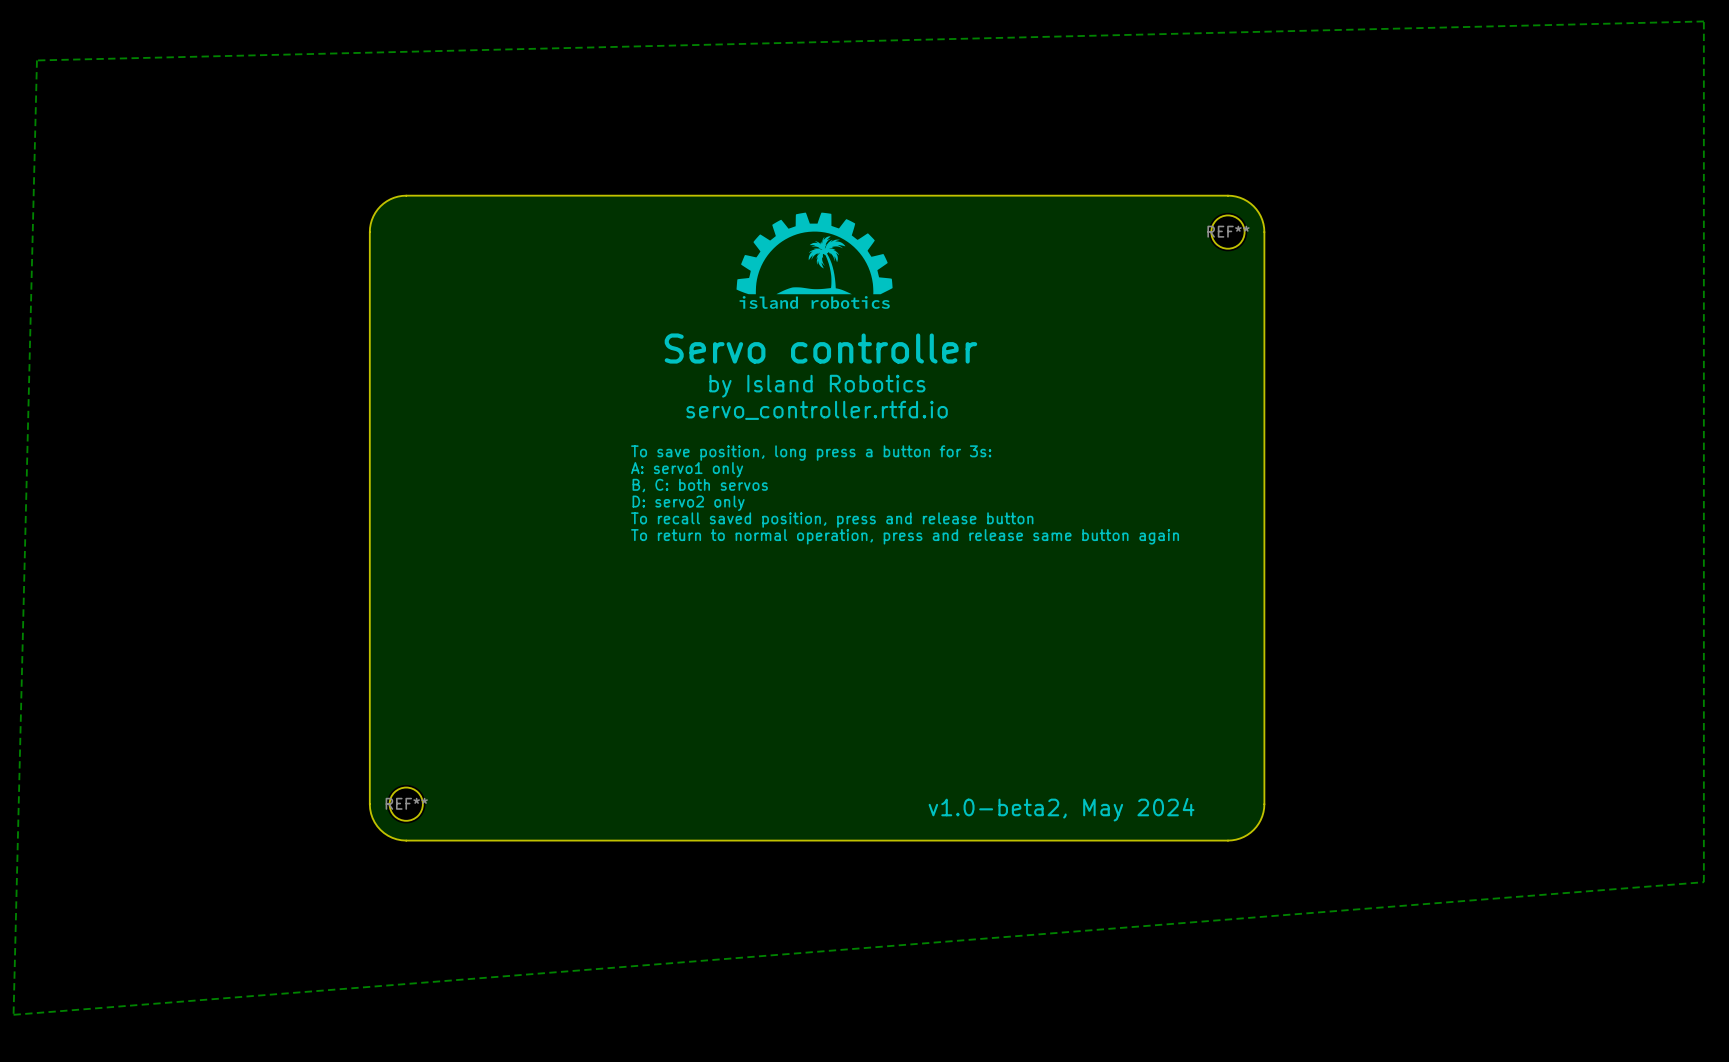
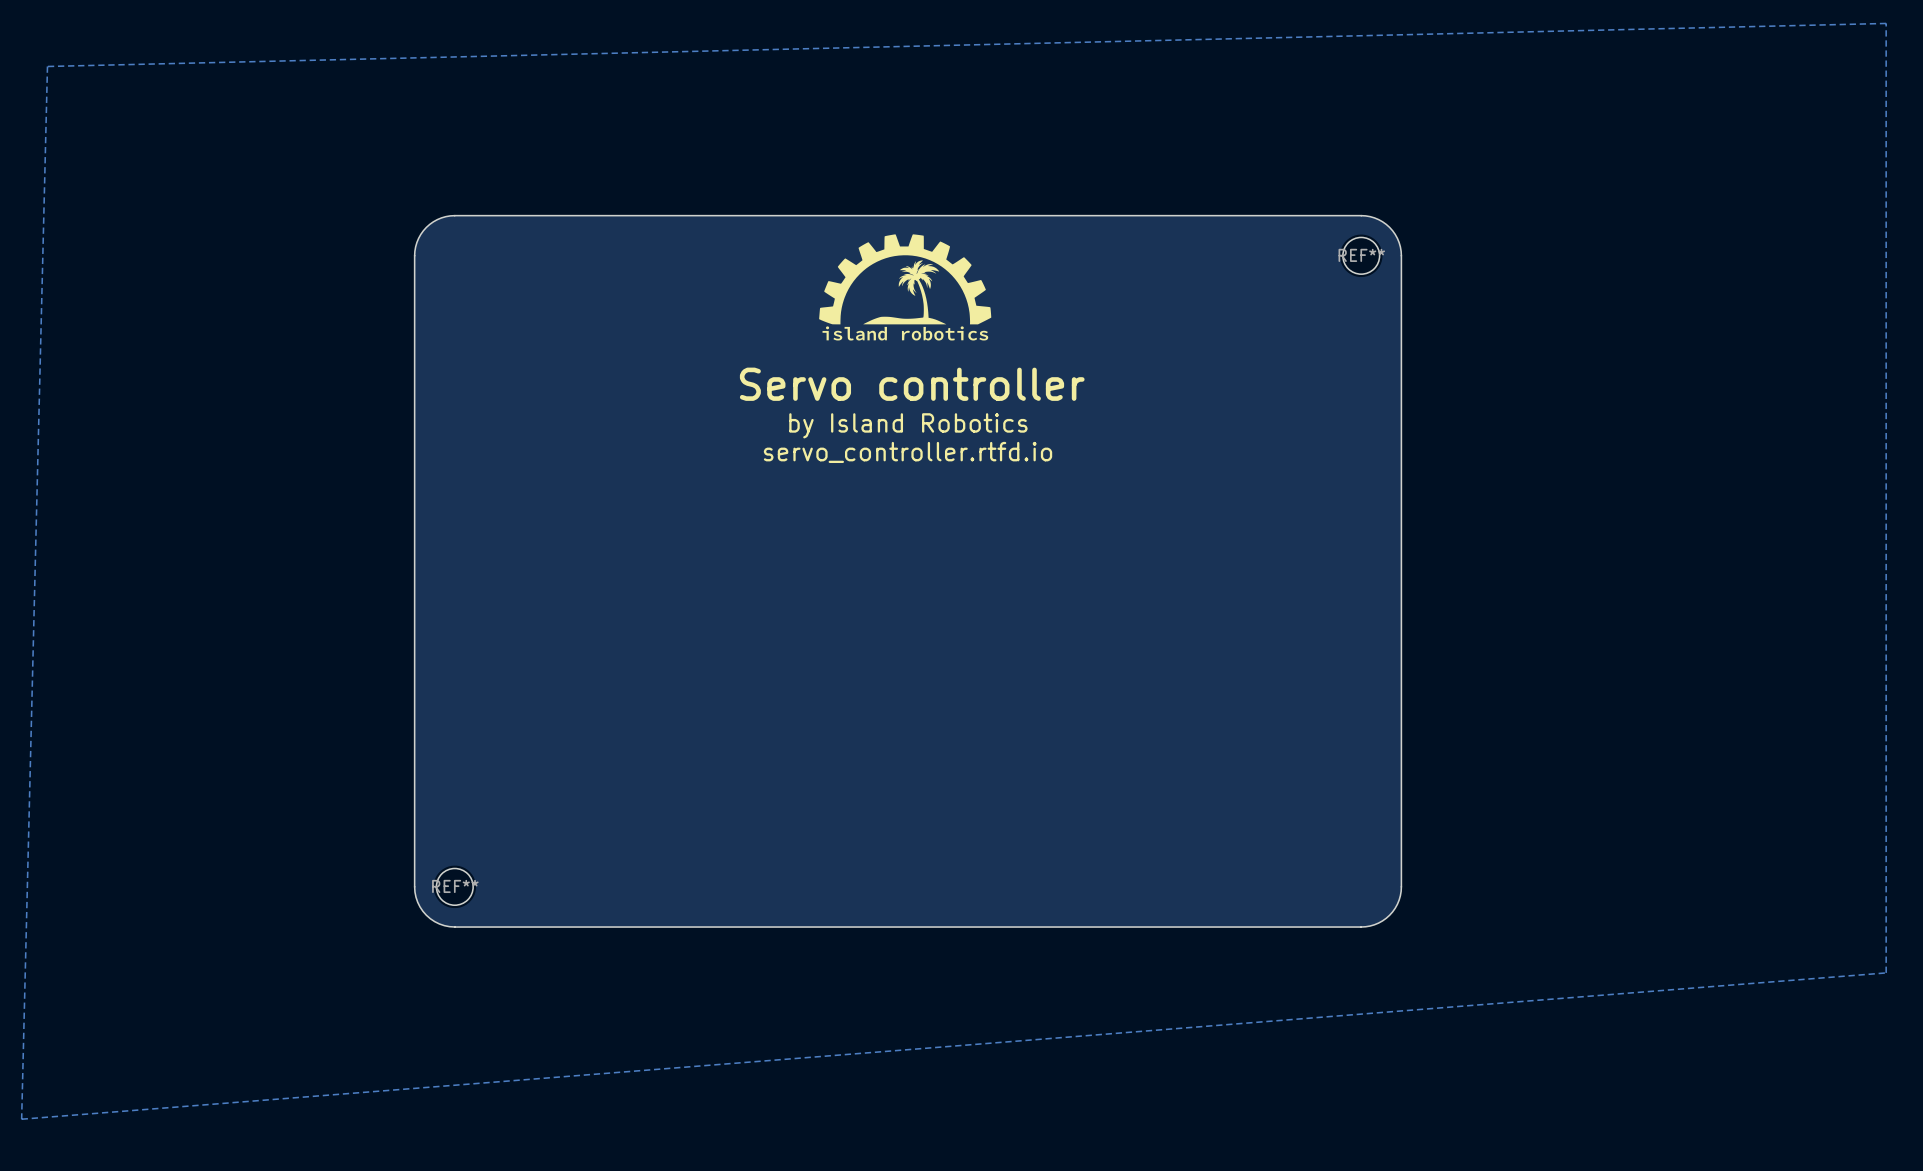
text: To save position, long press a button for 3s: (811, 453) -> none
text: A: servo1 only (687, 469) -> none
text: B, C: both servos (700, 485) -> none
text: D: servo2 only (688, 503) -> none
text: To recall saved position, press and release button (832, 520) -> none
text: To return to normal operation, press and release same button again (905, 536) -> none
text: v1.0-beta2, May 2024 (1061, 809) -> none

